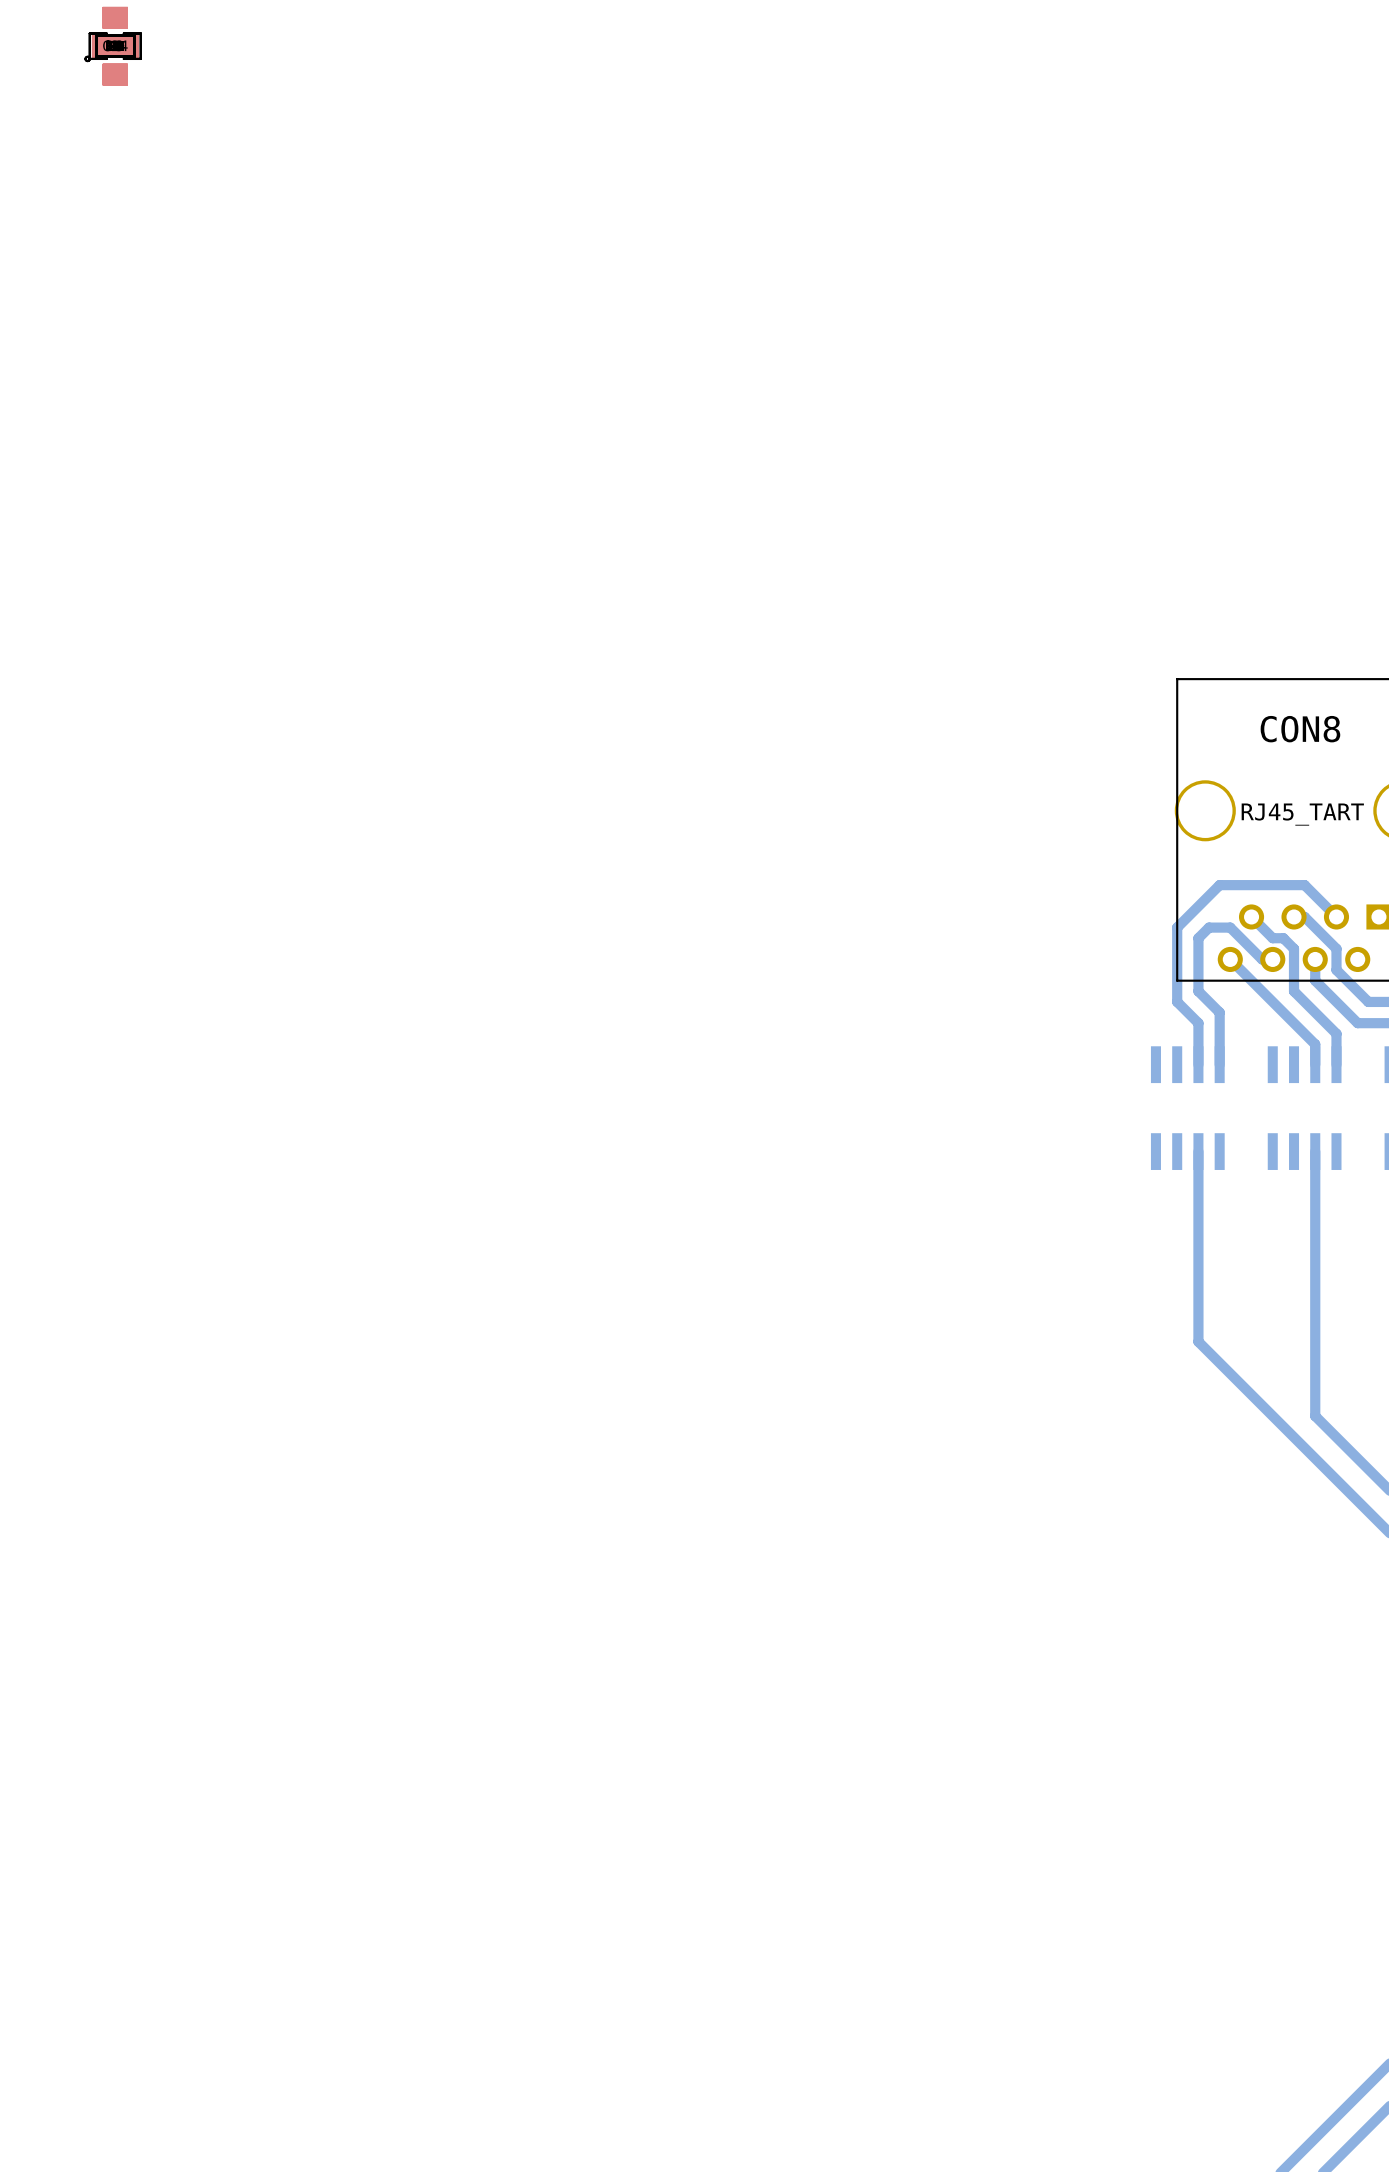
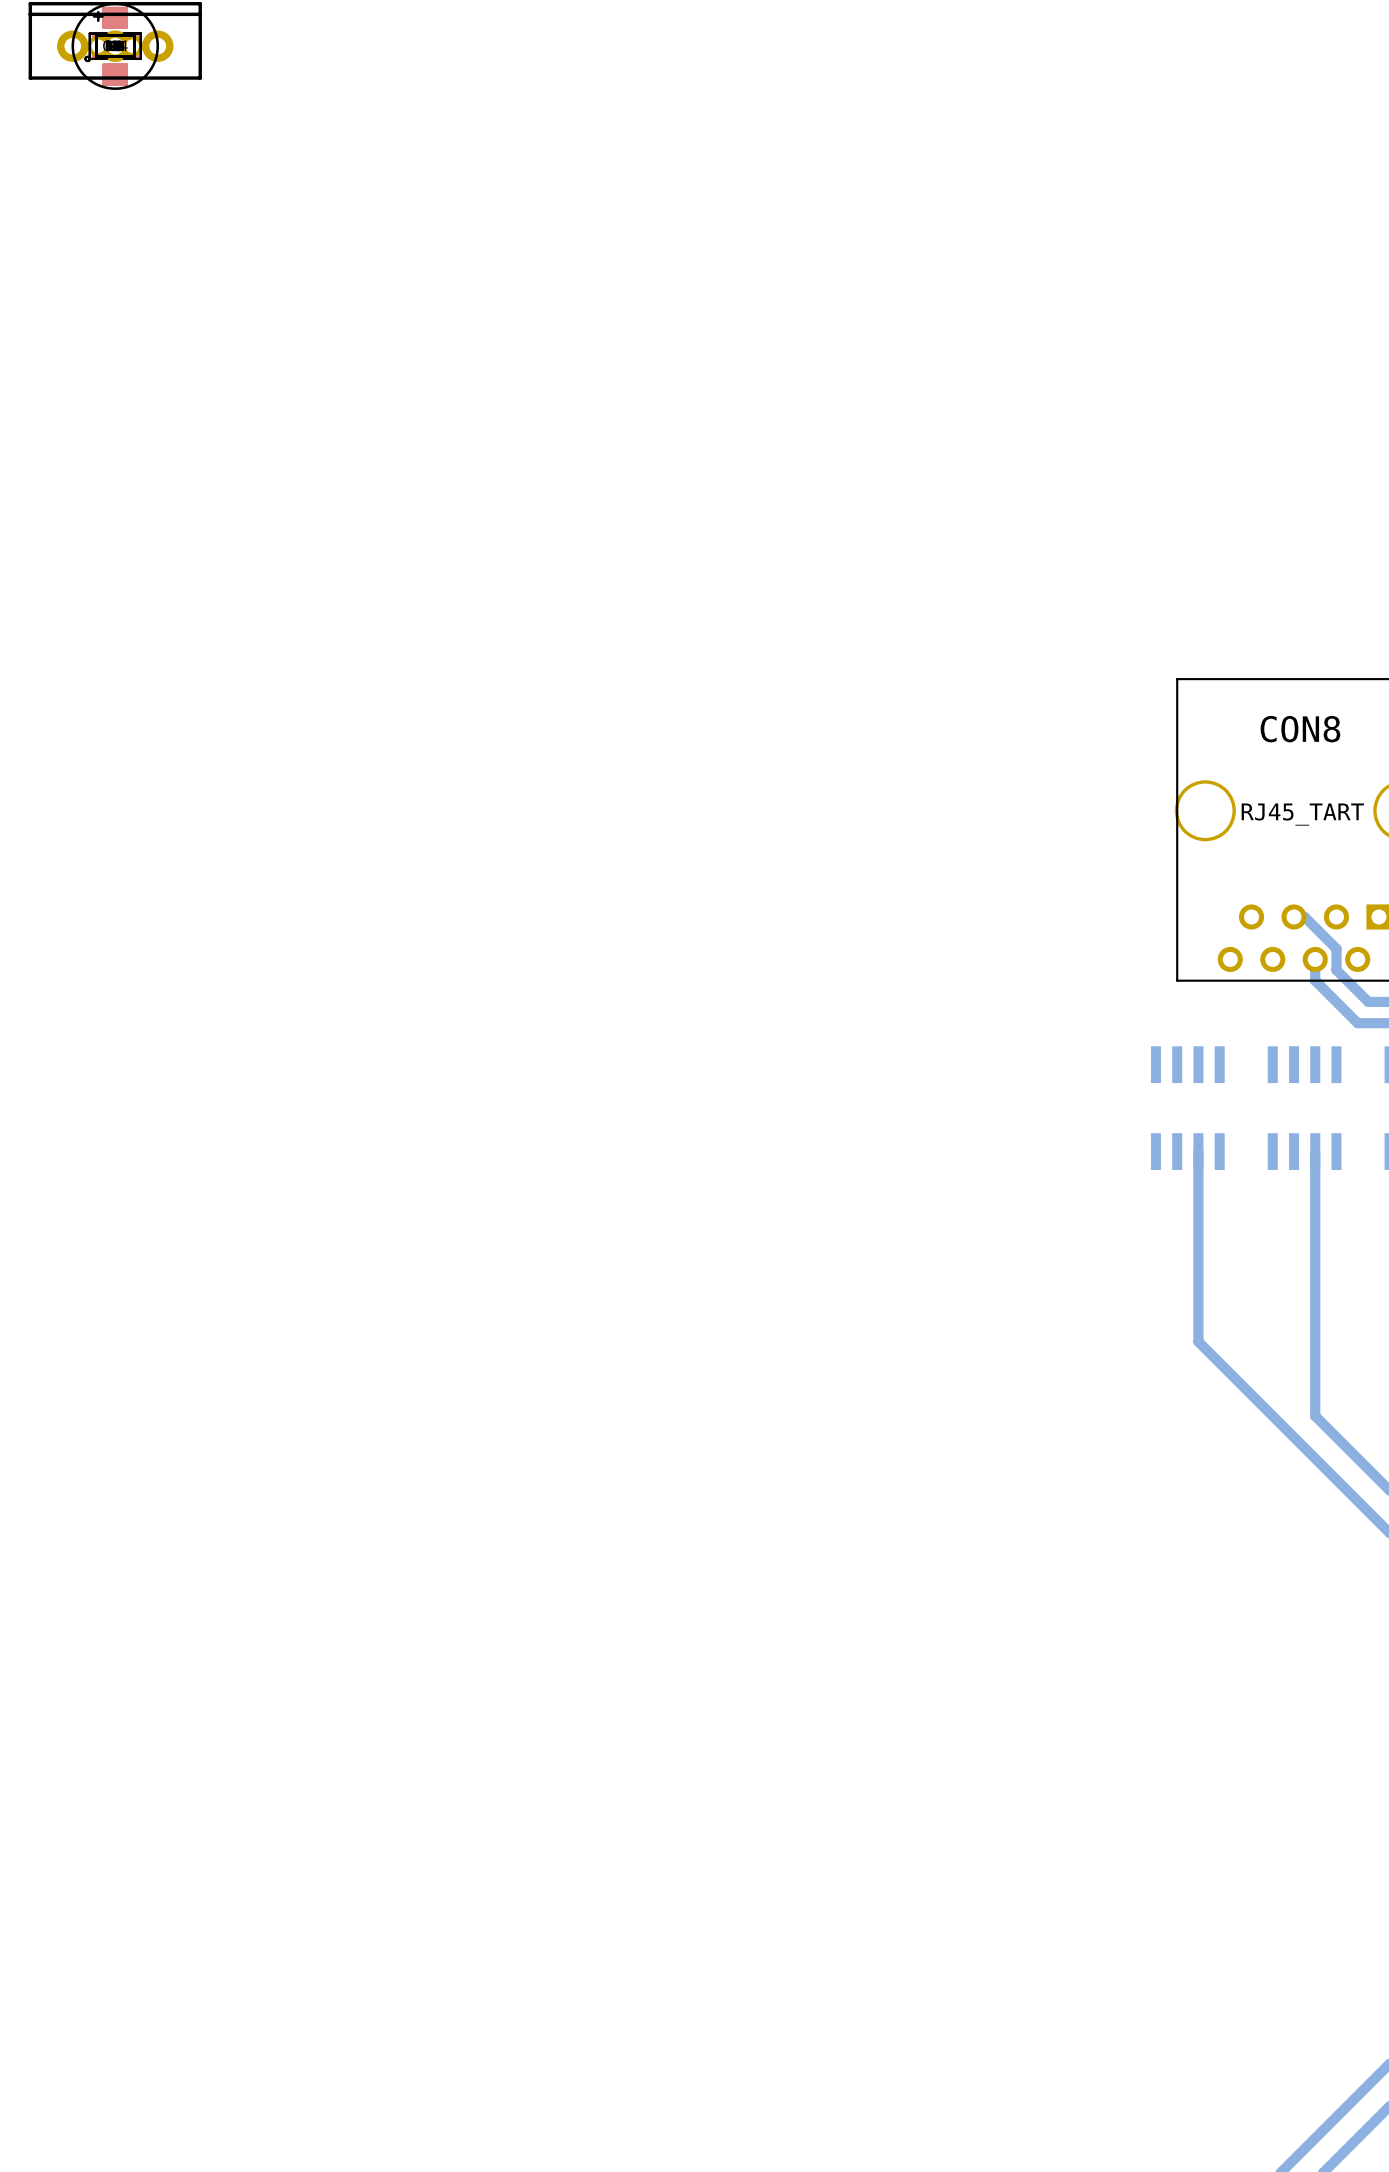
part: none -> (115, 40)
part: none -> (115, 46)
bottom track: (1251, 916) (1272, 938) (1283, 938) (1294, 948) (1294, 991) (1336, 1033) (1336, 1064) -> none
bottom track: (1336, 916) (1304, 885) (1219, 885) (1177, 927) (1177, 1001) (1198, 1023) (1198, 1064) -> none
bottom track: (1230, 959) (1315, 1044) (1315, 1064) -> none
bottom track: (1272, 959) (1262, 959) (1230, 927) (1209, 927) (1198, 938) (1198, 991) (1219, 1012) (1219, 1064) -> none

